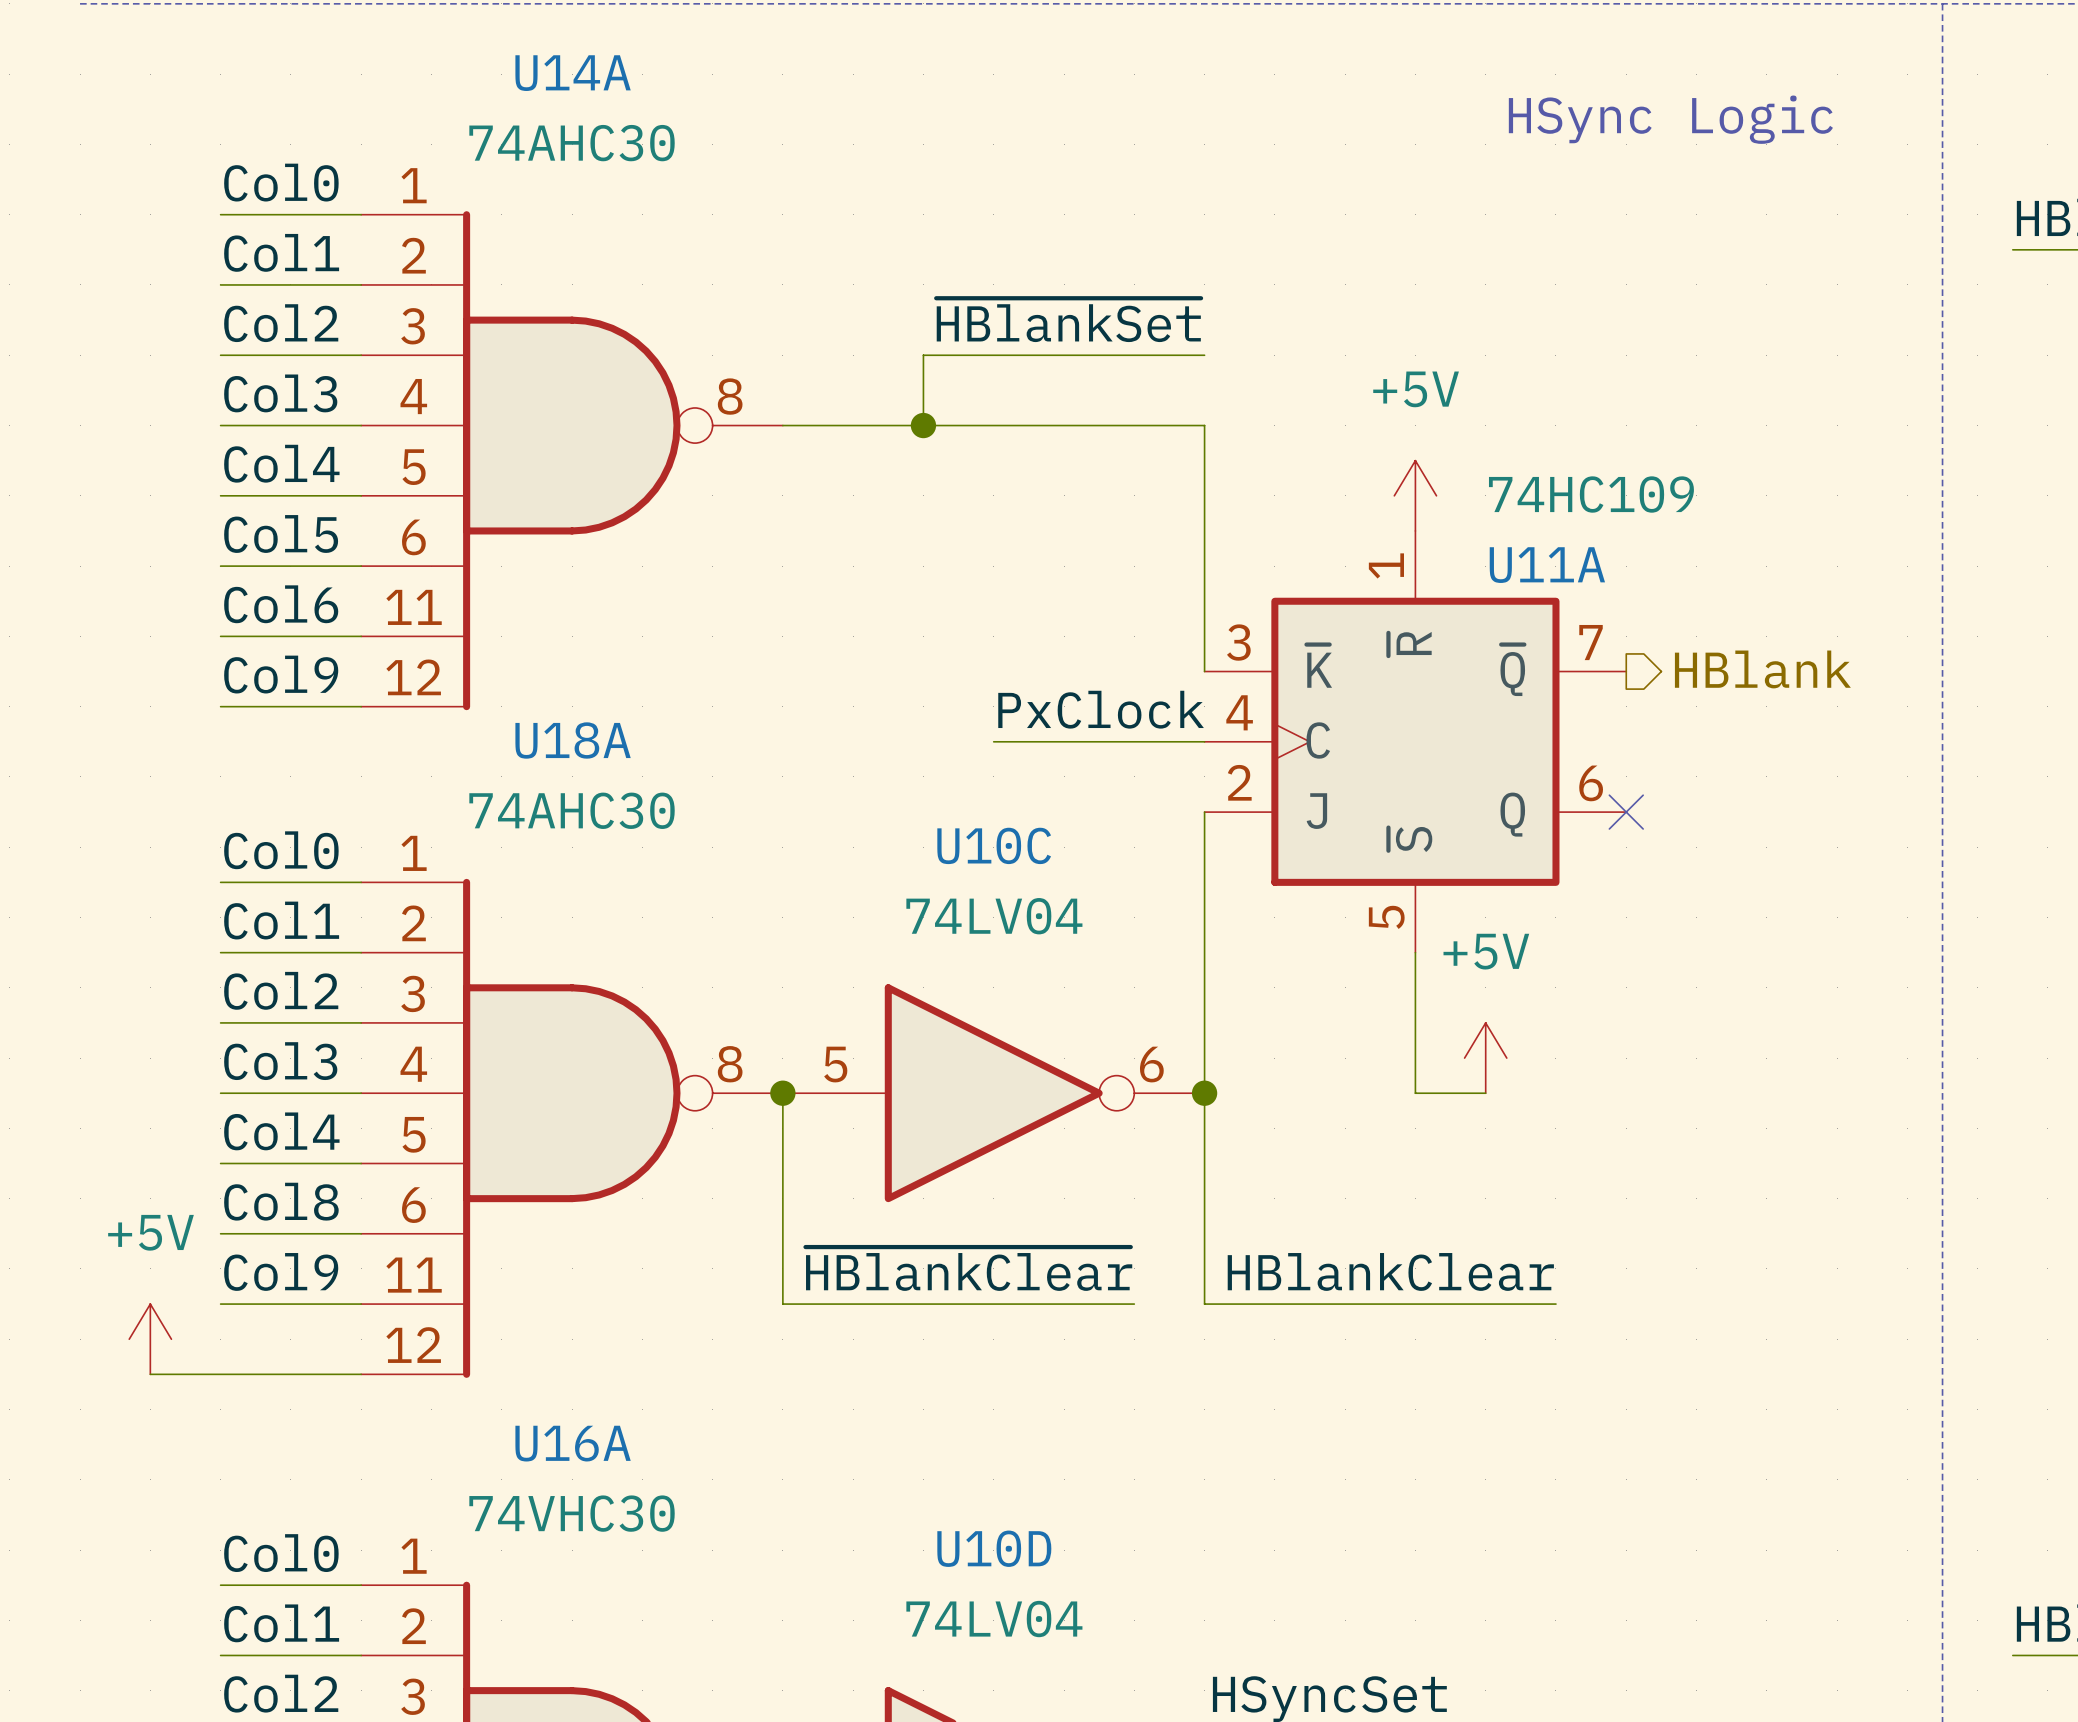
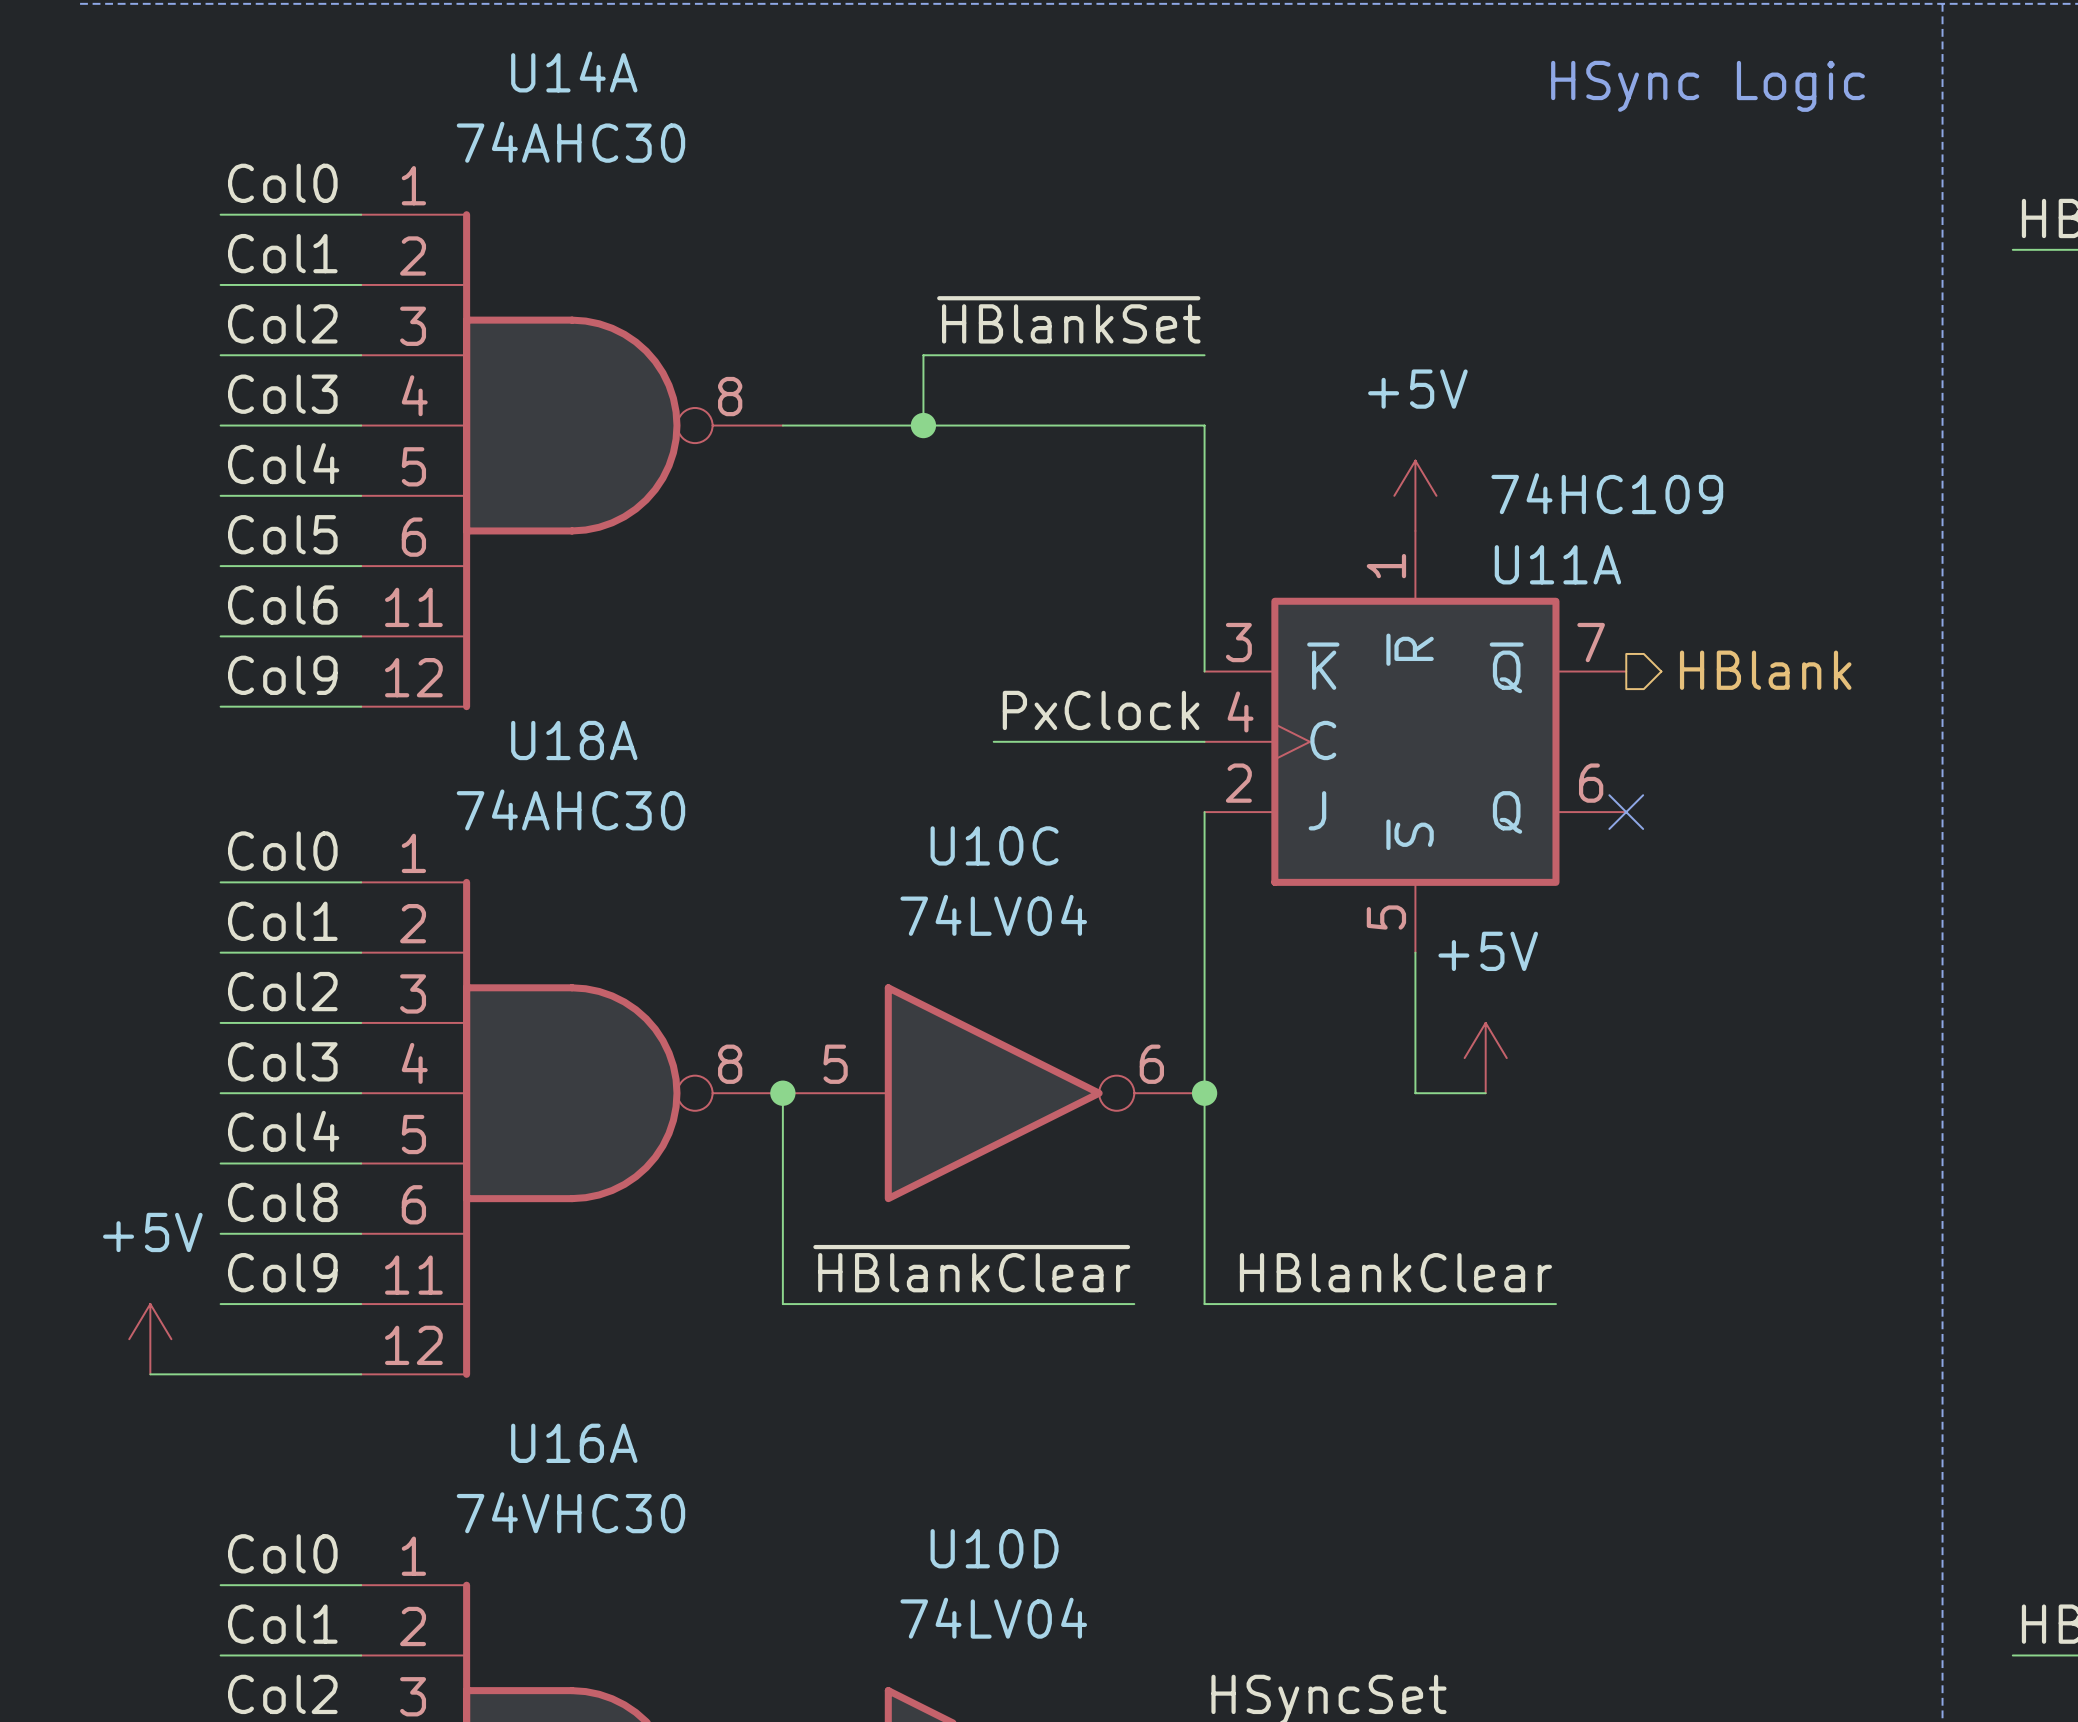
text position: HSync Logic (1670, 119) -> HSync Logic (1707, 86)

